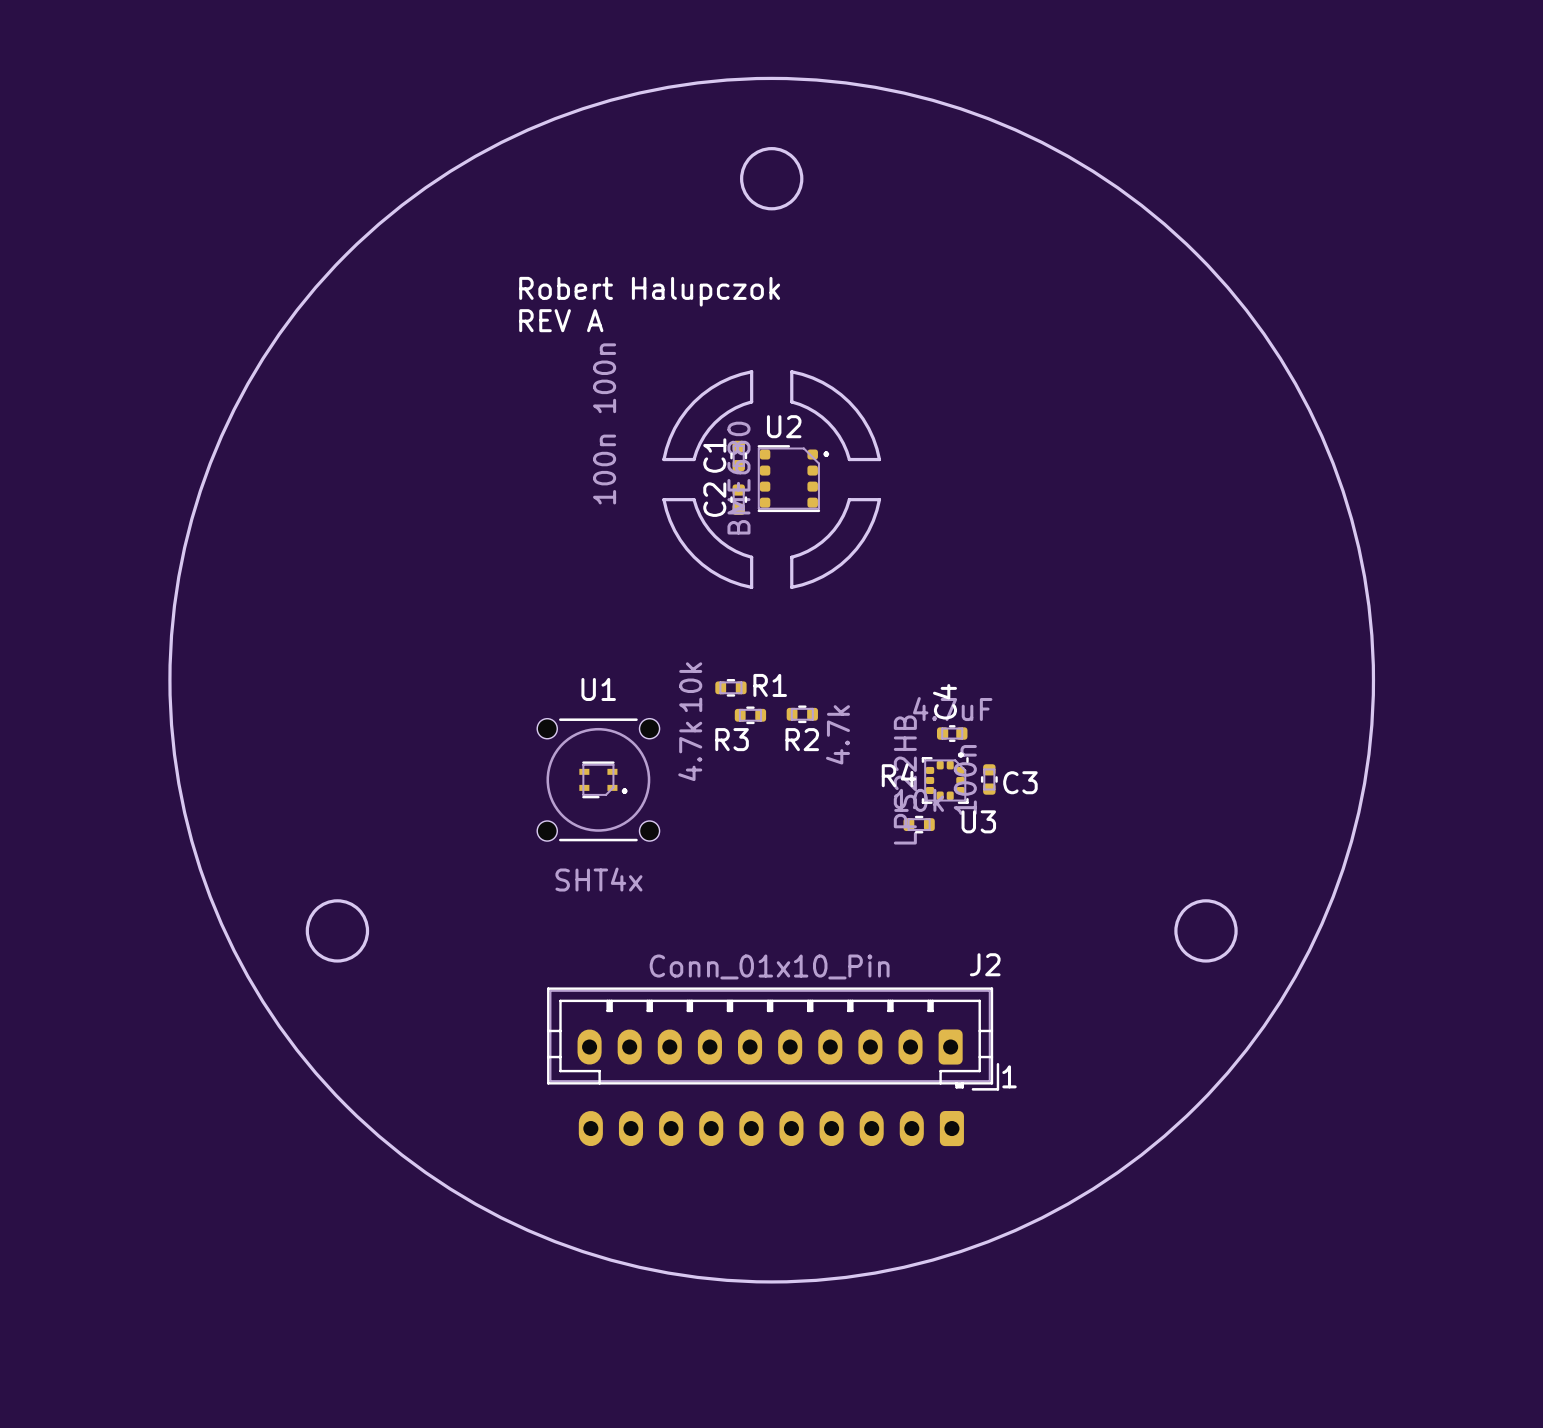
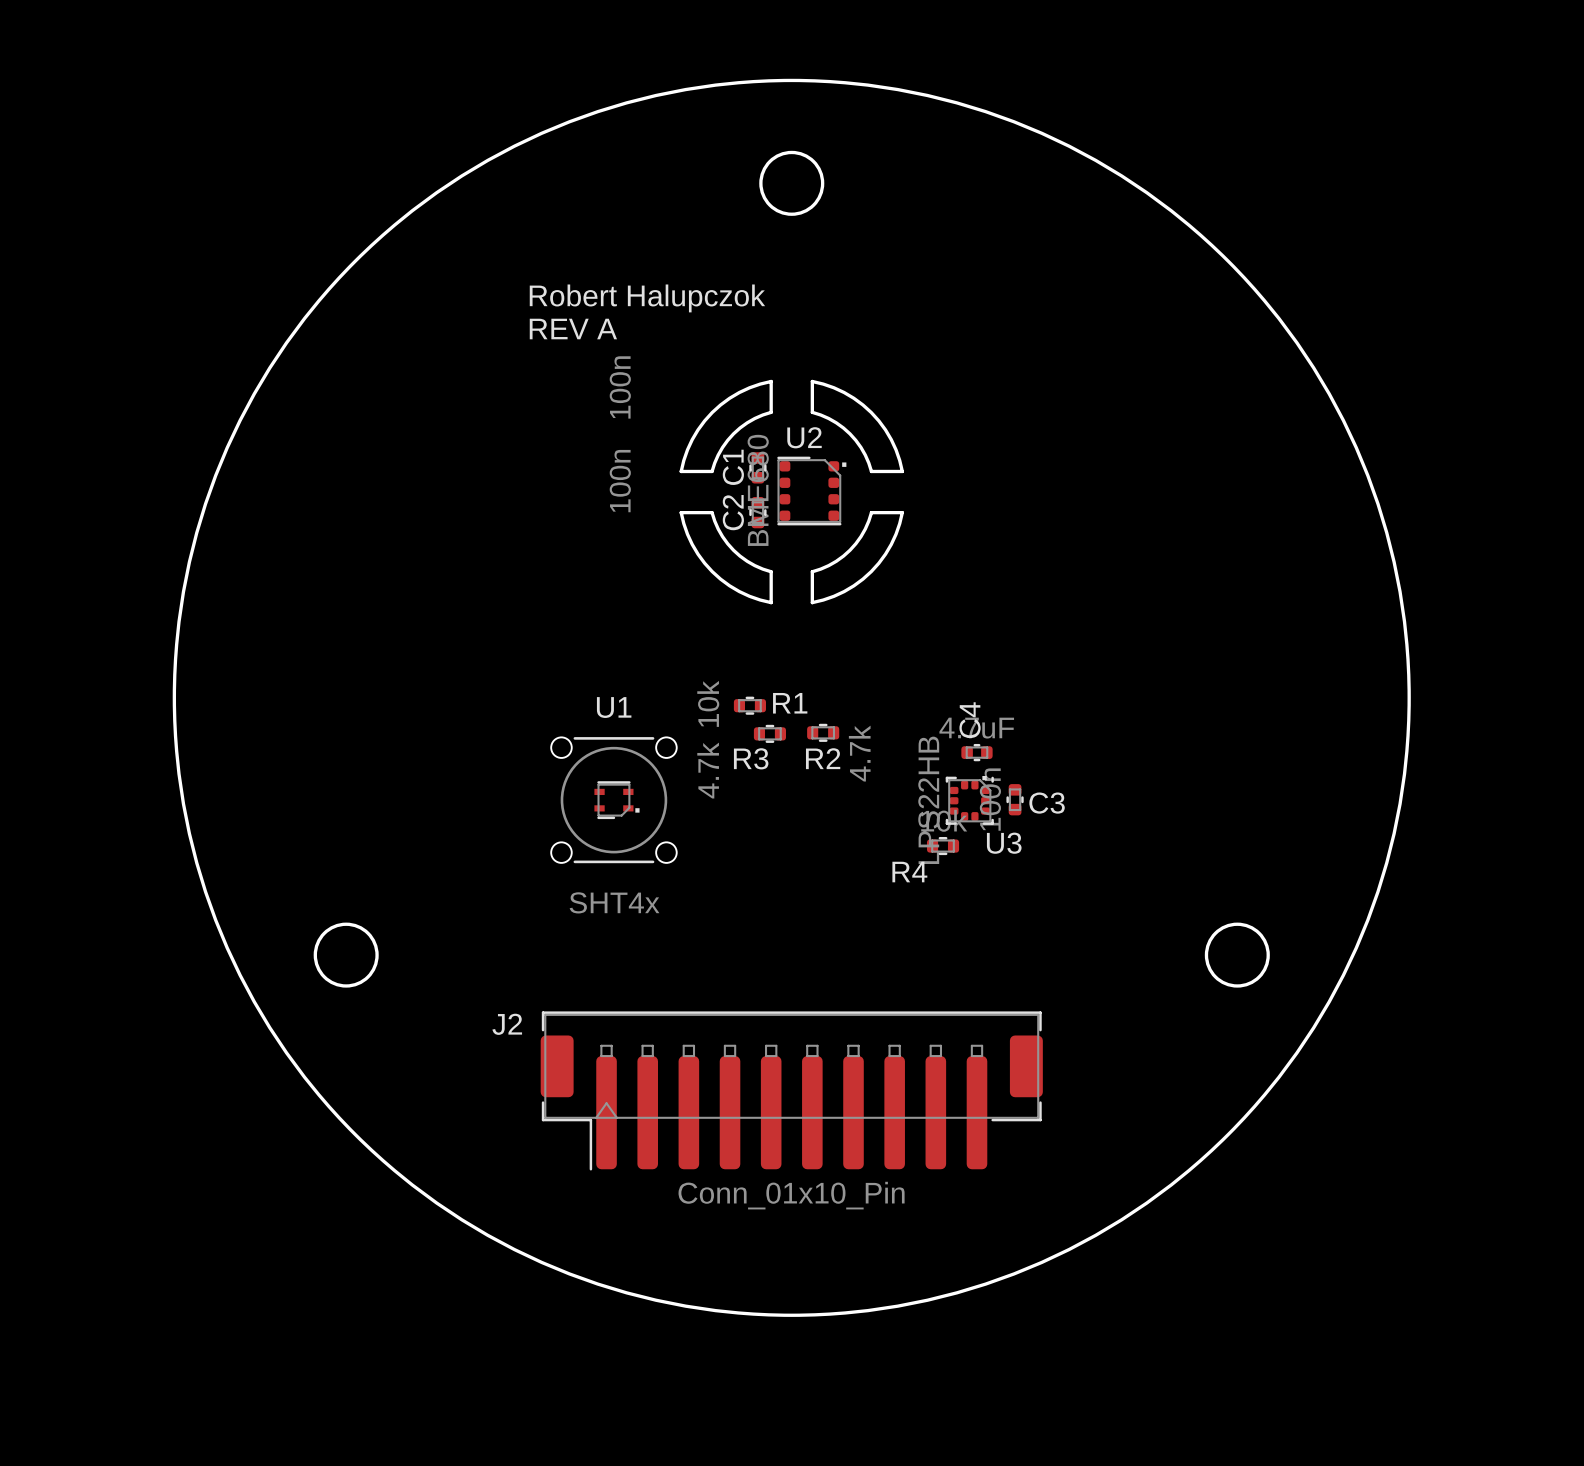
R4 name position: R4 (899, 775) -> R4 (909, 872)
J2 name position: J2 (985, 964) -> J2 (507, 1024)
J2 value position: Conn_01x10_Pin (769, 966) -> Conn_01x10_Pin (791, 1195)
J2 footprint: [547, 987, 1000, 1091] -> [540, 1011, 1043, 1171]
text: 1 (1009, 1076) -> none
part: (771, 1128) -> none

